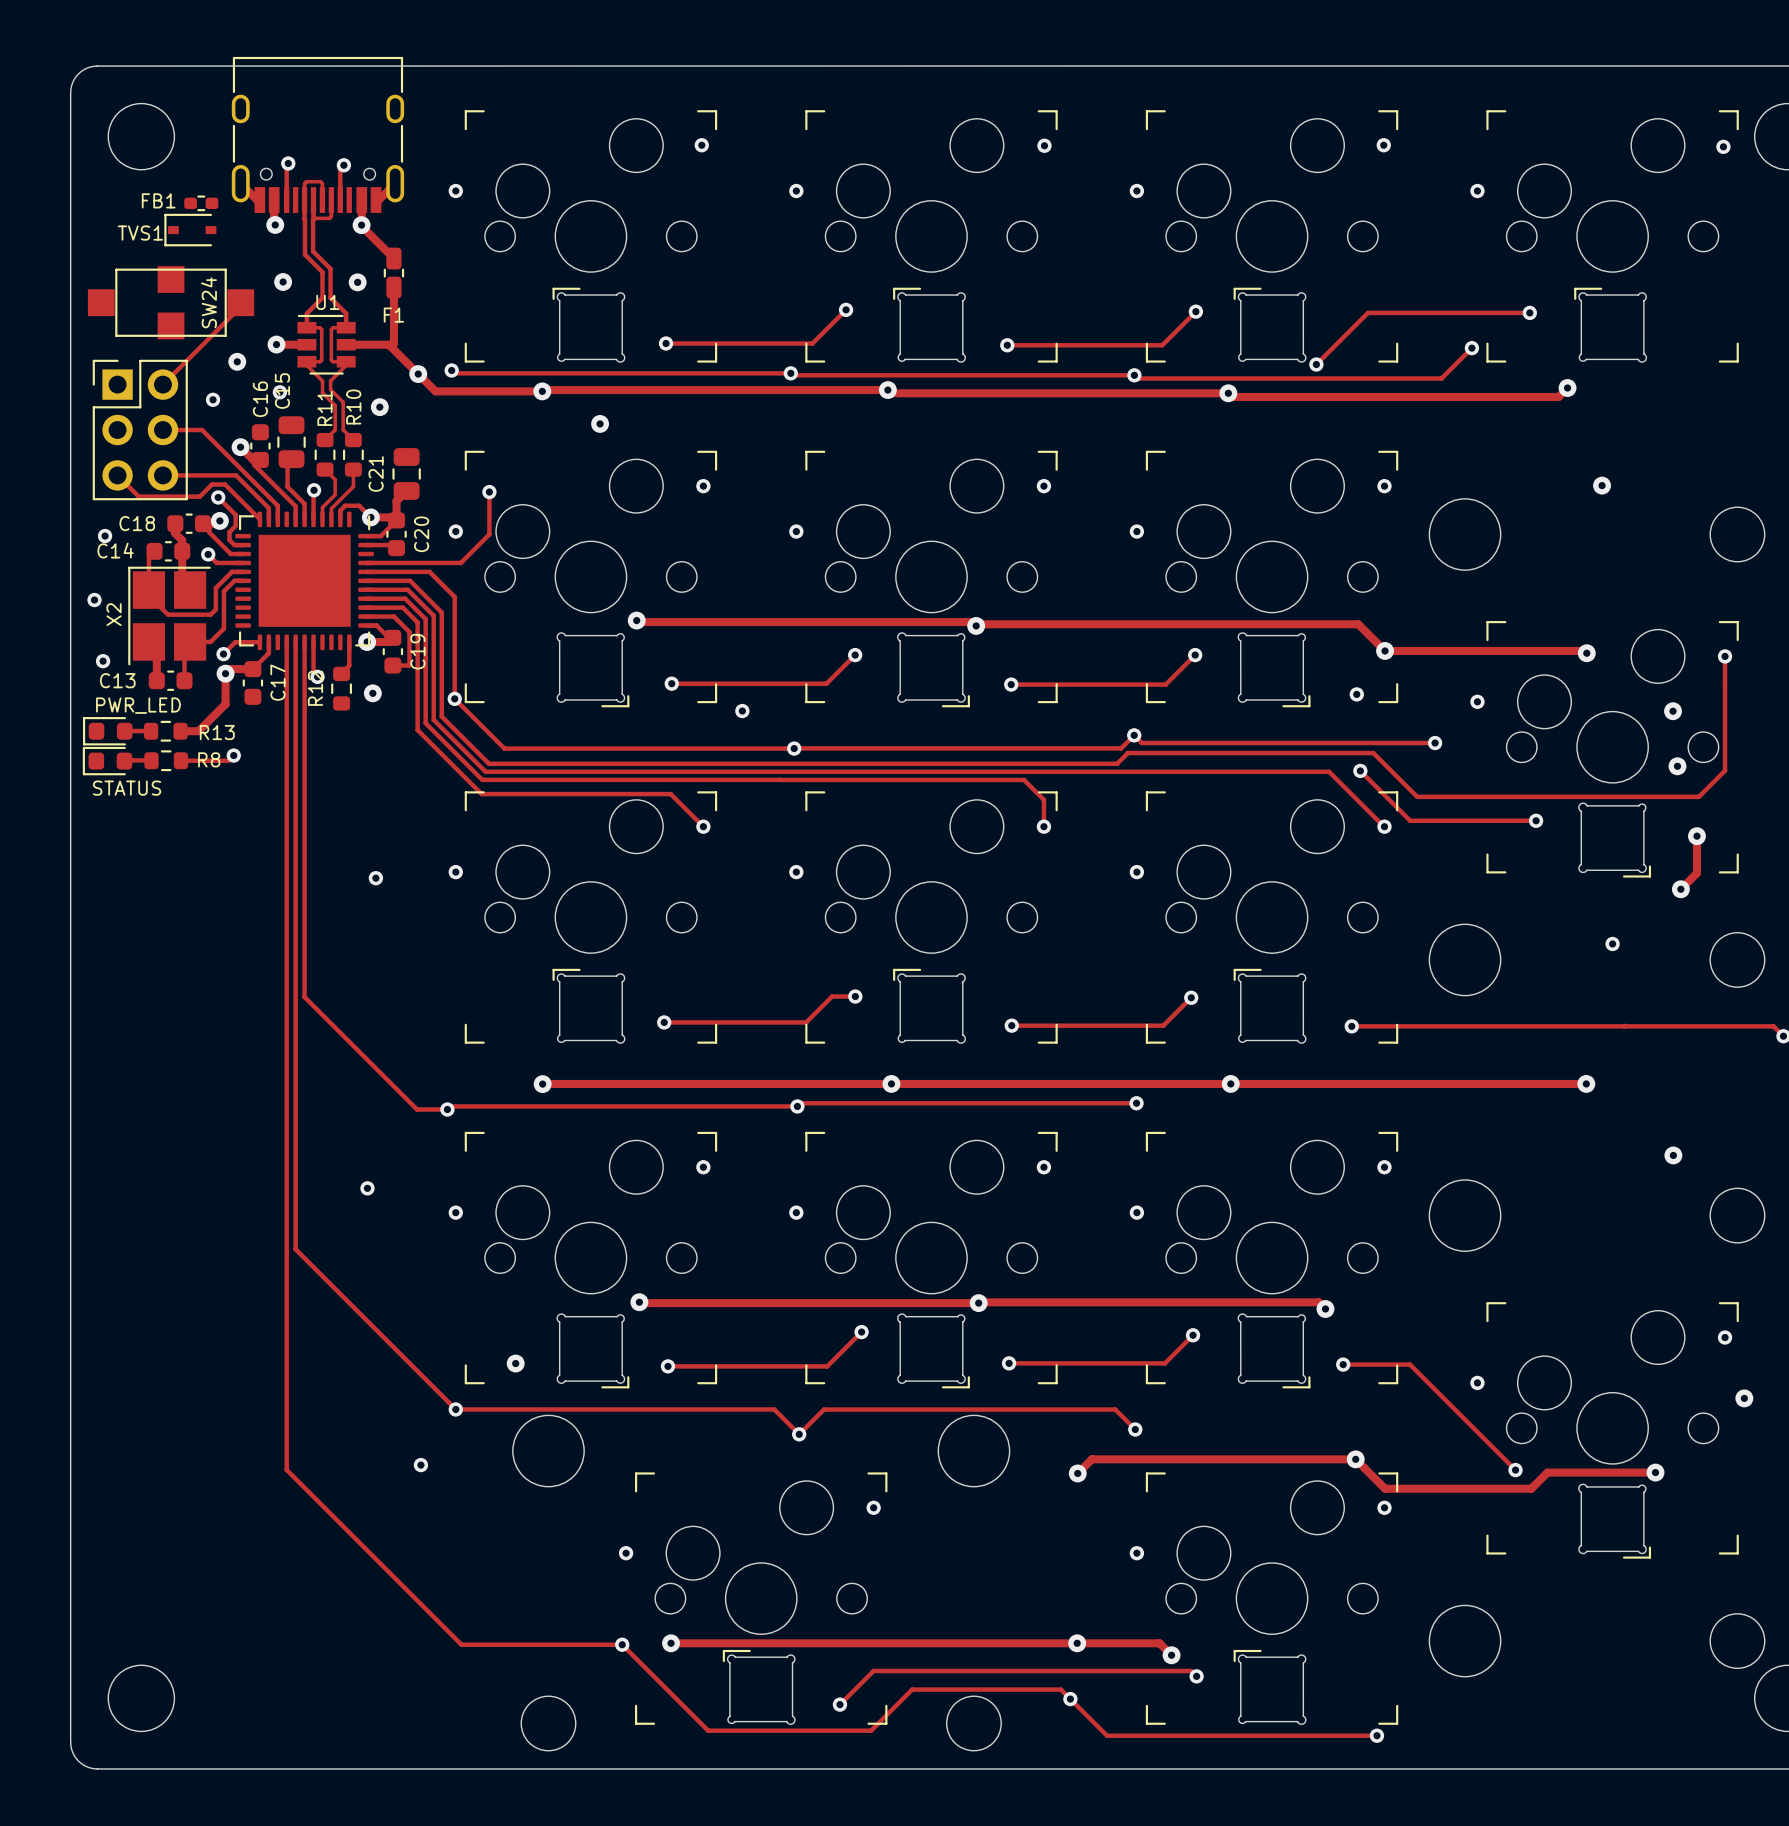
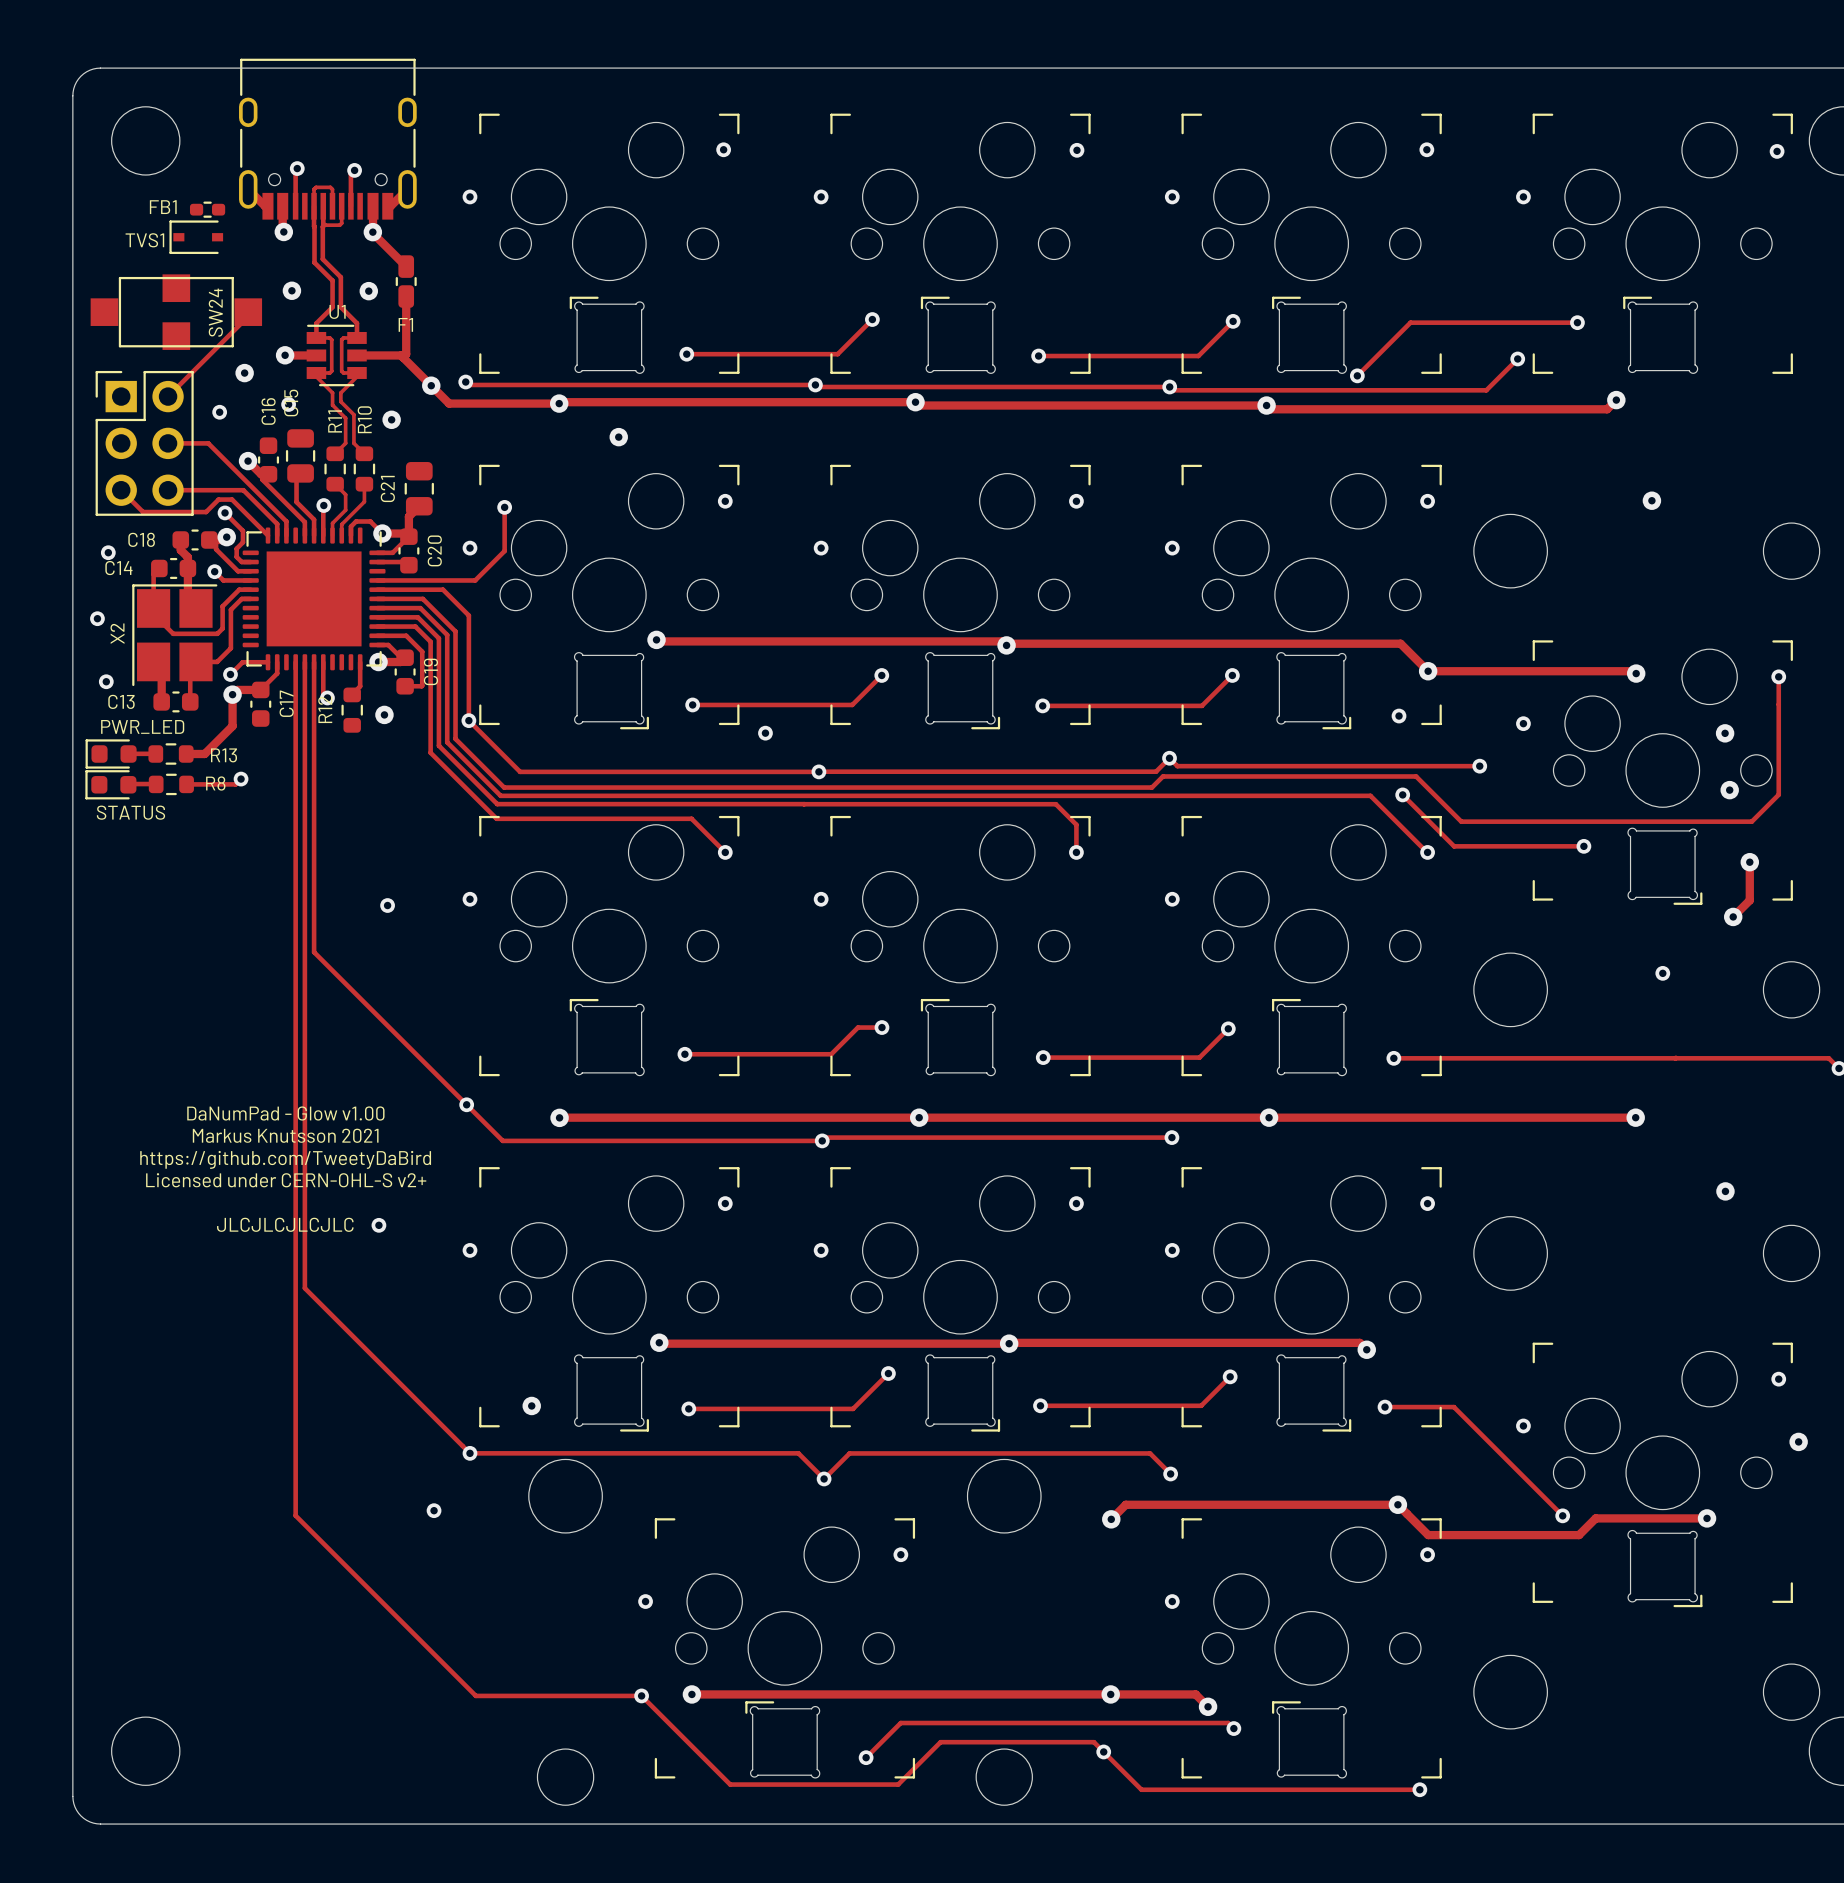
track: (304, 923) (304, 997) (417, 1109) (447, 1109) (450, 1106) (487, 1106) -> (314, 952) (502, 1140)
text: none -> DaNumPad - Glow v1.00 (285, 1113)
text: none -> Markus Knutsson 2021 (285, 1135)
via position: (447, 1109) -> (466, 1104)
text: none -> https://github.com/TweetyDaBird (285, 1159)
text: none -> Licensed under CERN-OHL-S v2+ (286, 1180)
text: none -> JLCJLCJLCJLC (285, 1224)

